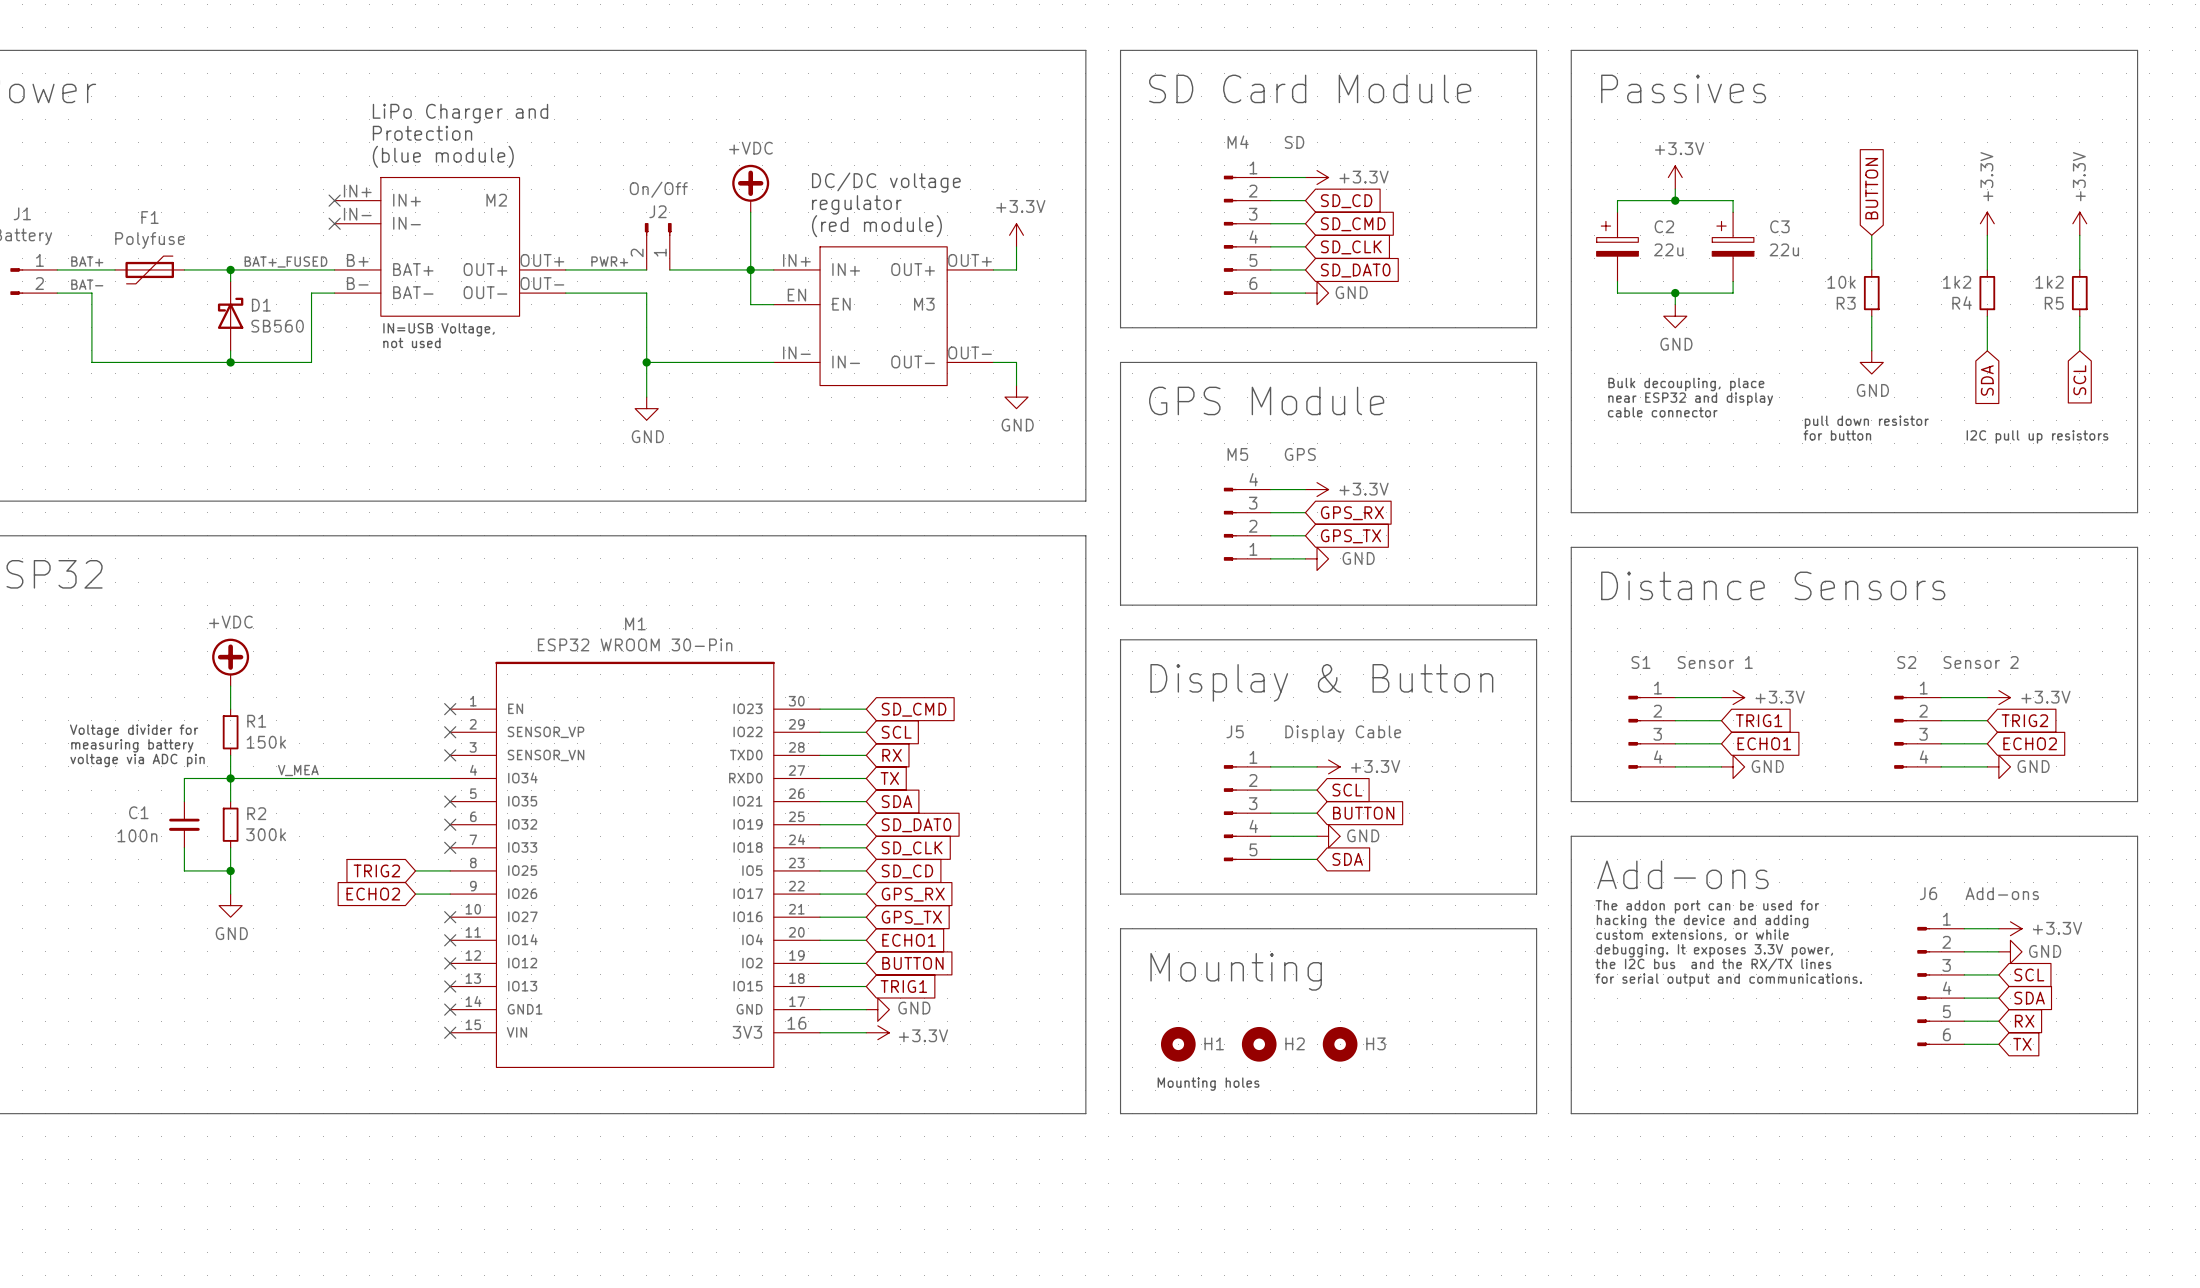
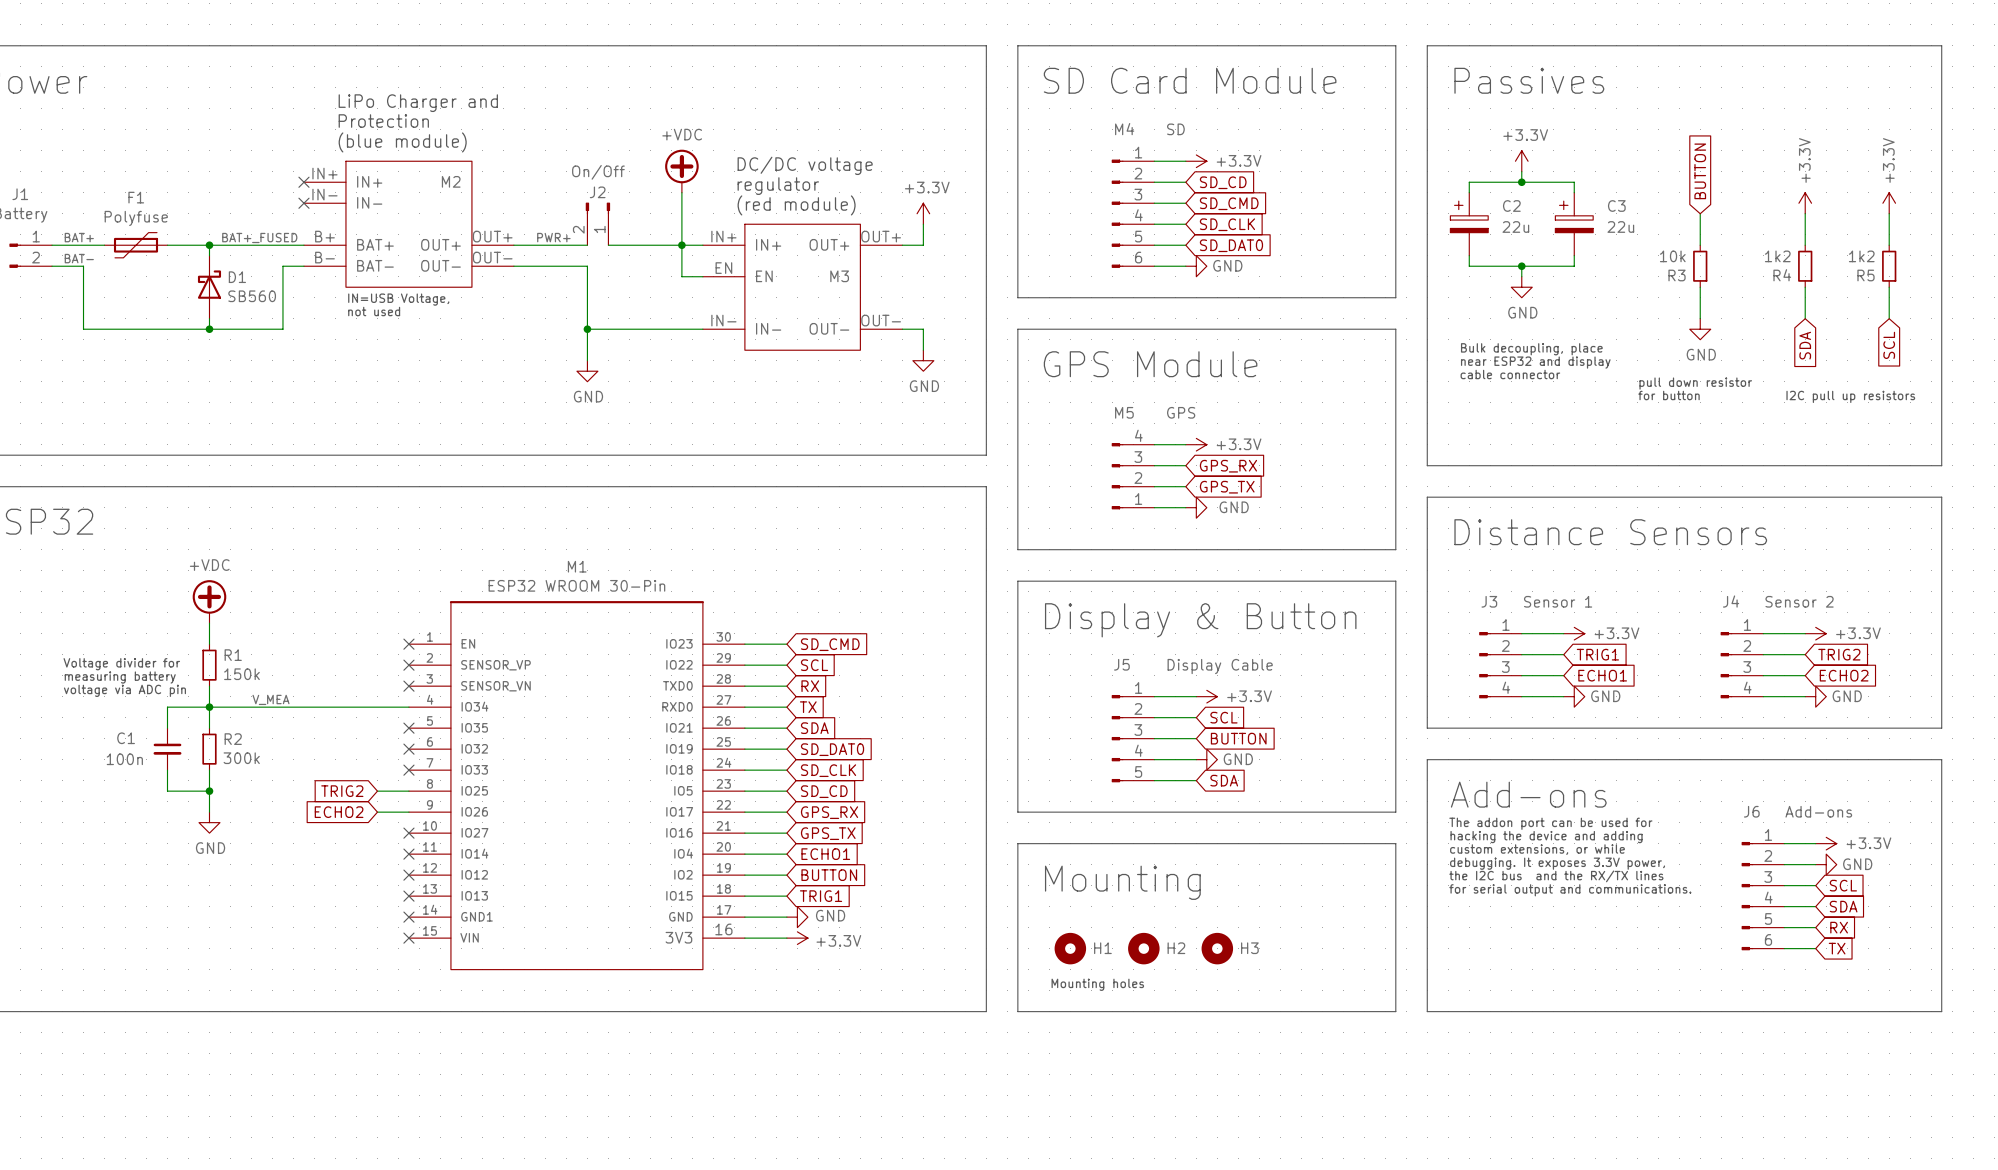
S1 name: S1 (1640, 662) -> J3 (1489, 601)
S2 name: S2 (1906, 662) -> J4 (1731, 601)

